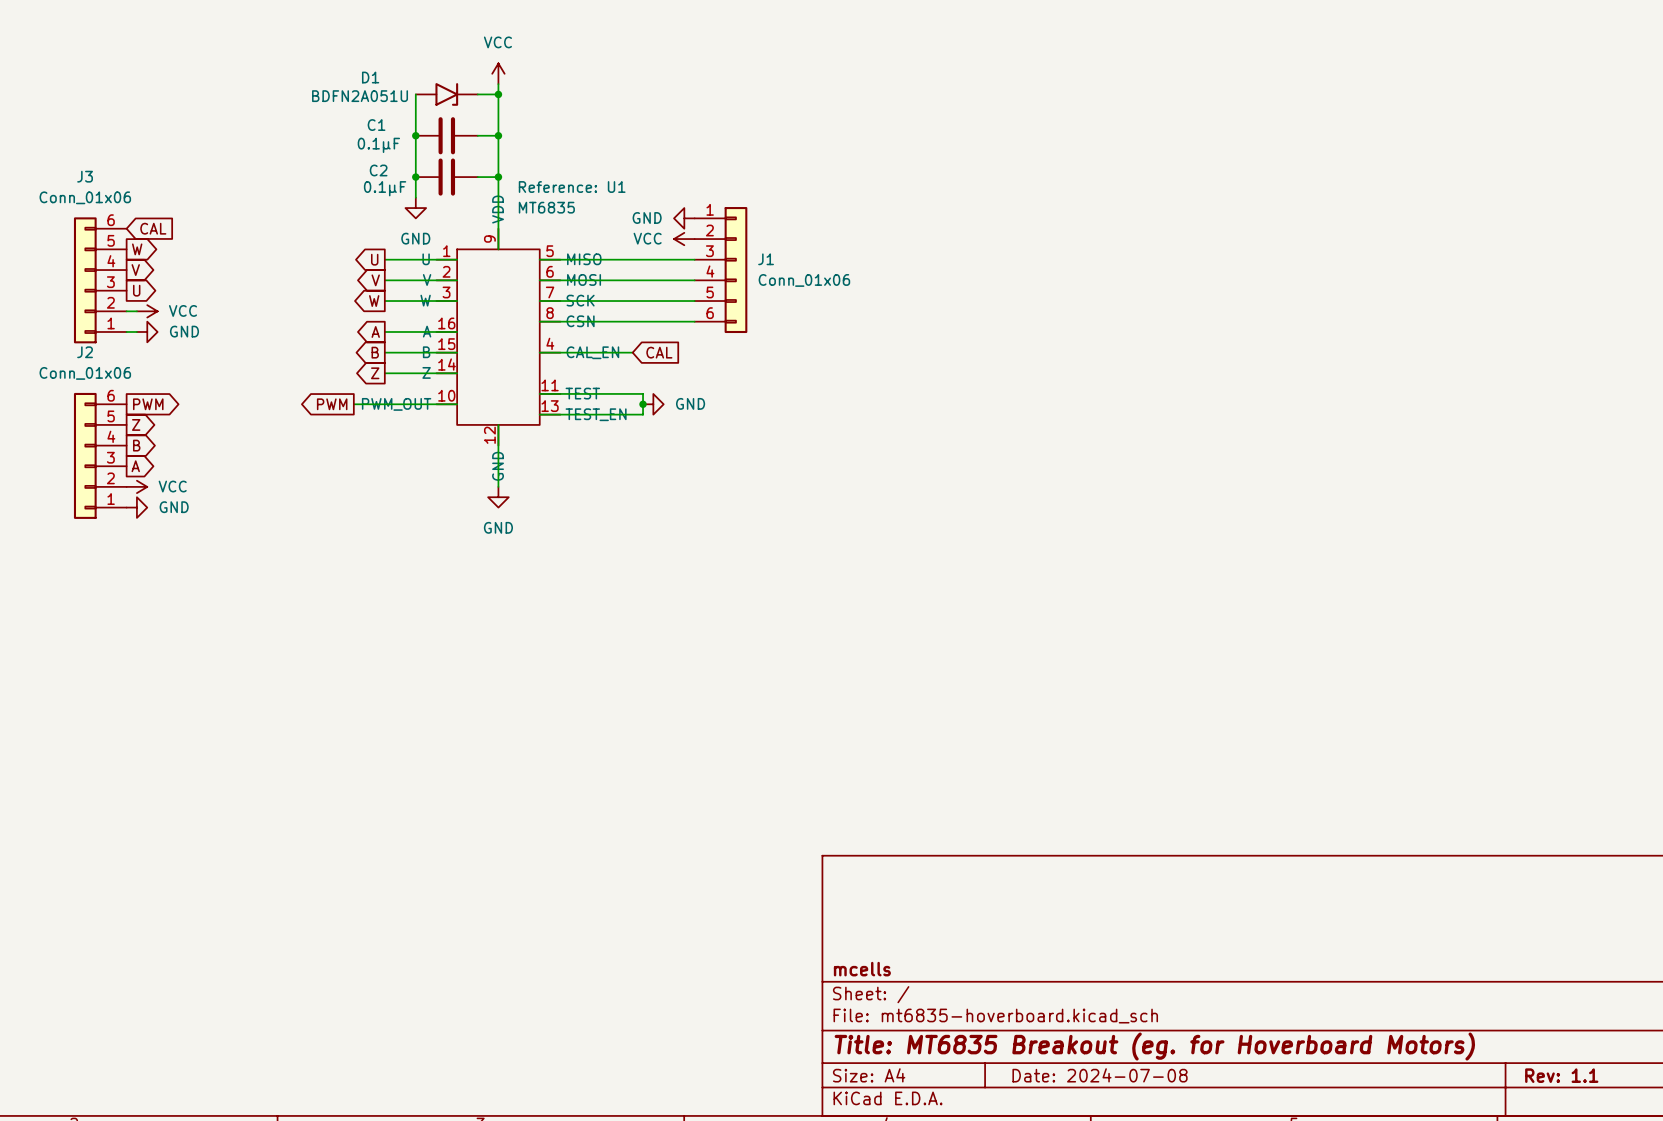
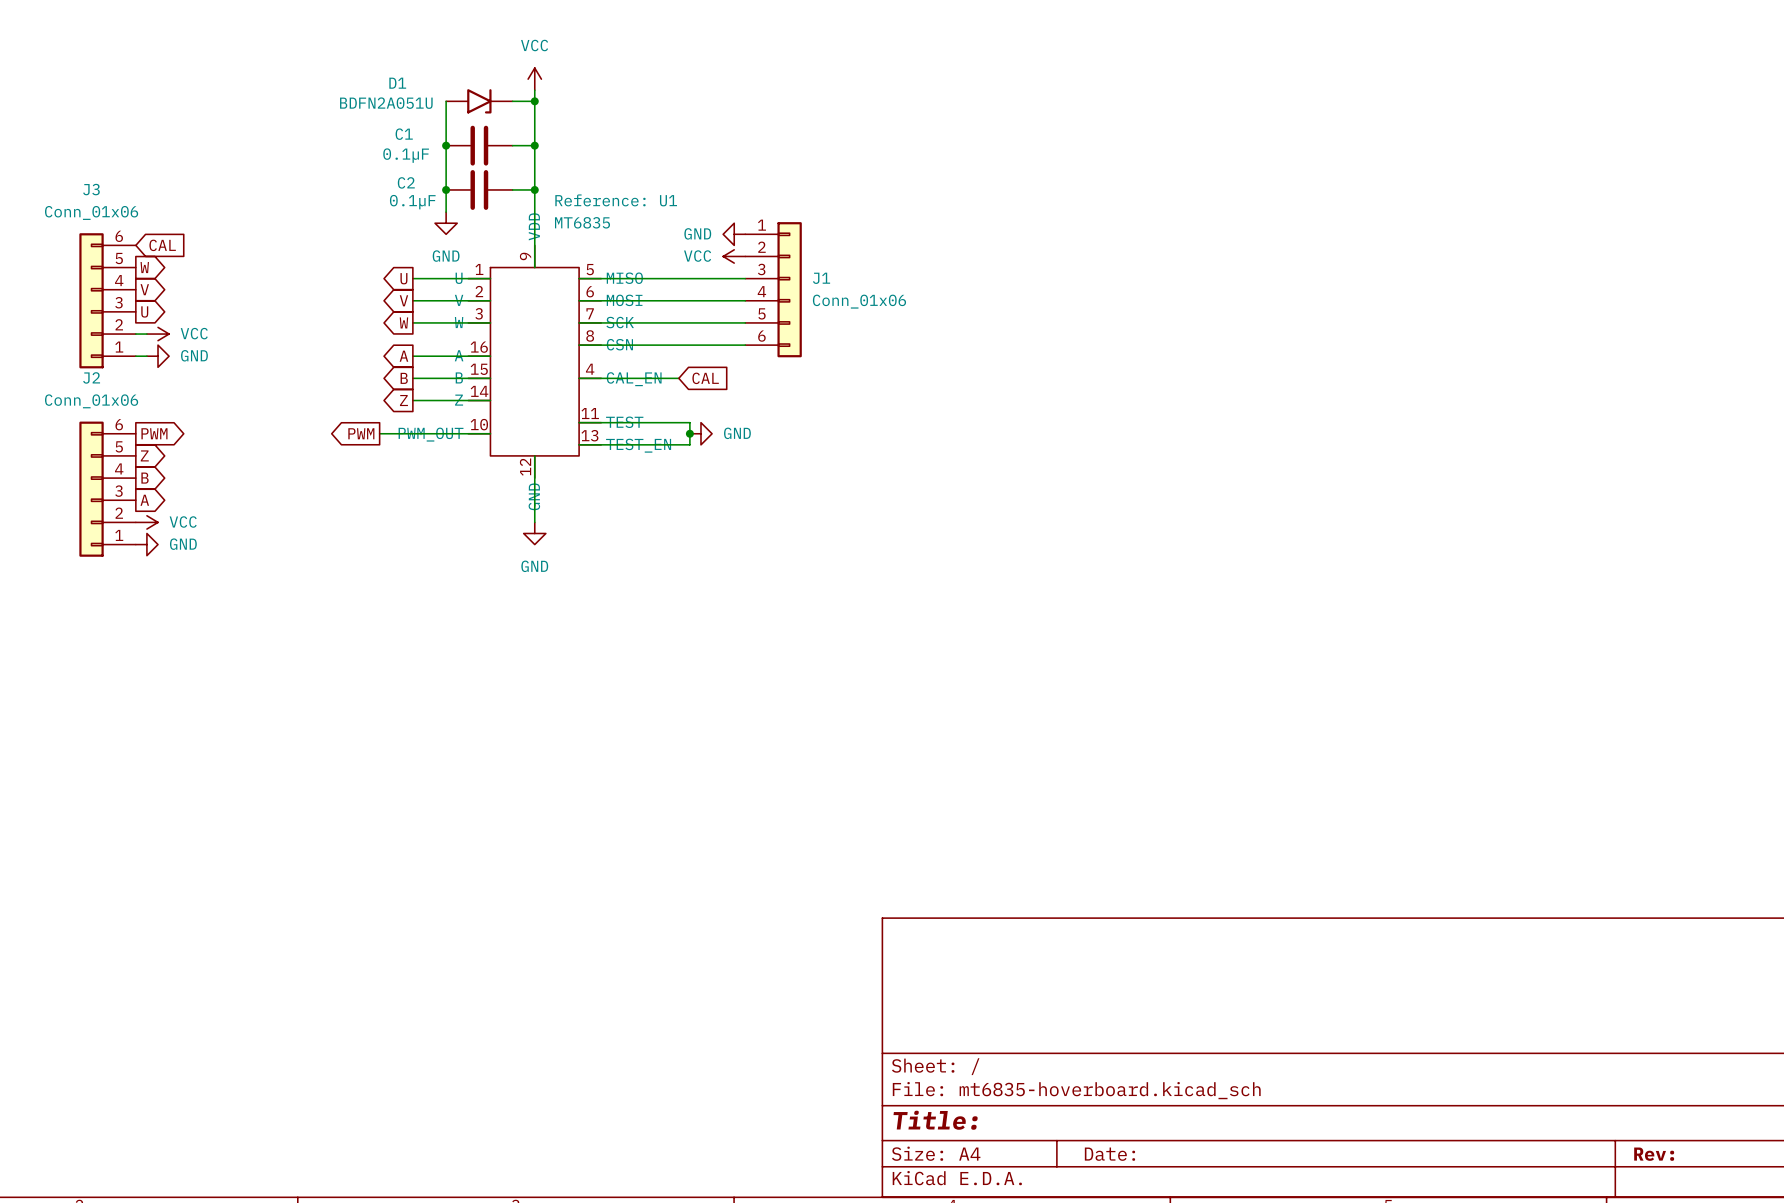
title block: mcells (862, 969) -> none
title block: Title: MT6835 Breakout (eg. for Hoverboard Motors) (1154, 1046) -> Title: (935, 1120)
title block: Date: 2024-07-08 (1100, 1075) -> Date: (1109, 1154)
title block: Rev: 1.1 (1561, 1075) -> Rev: (1654, 1154)

